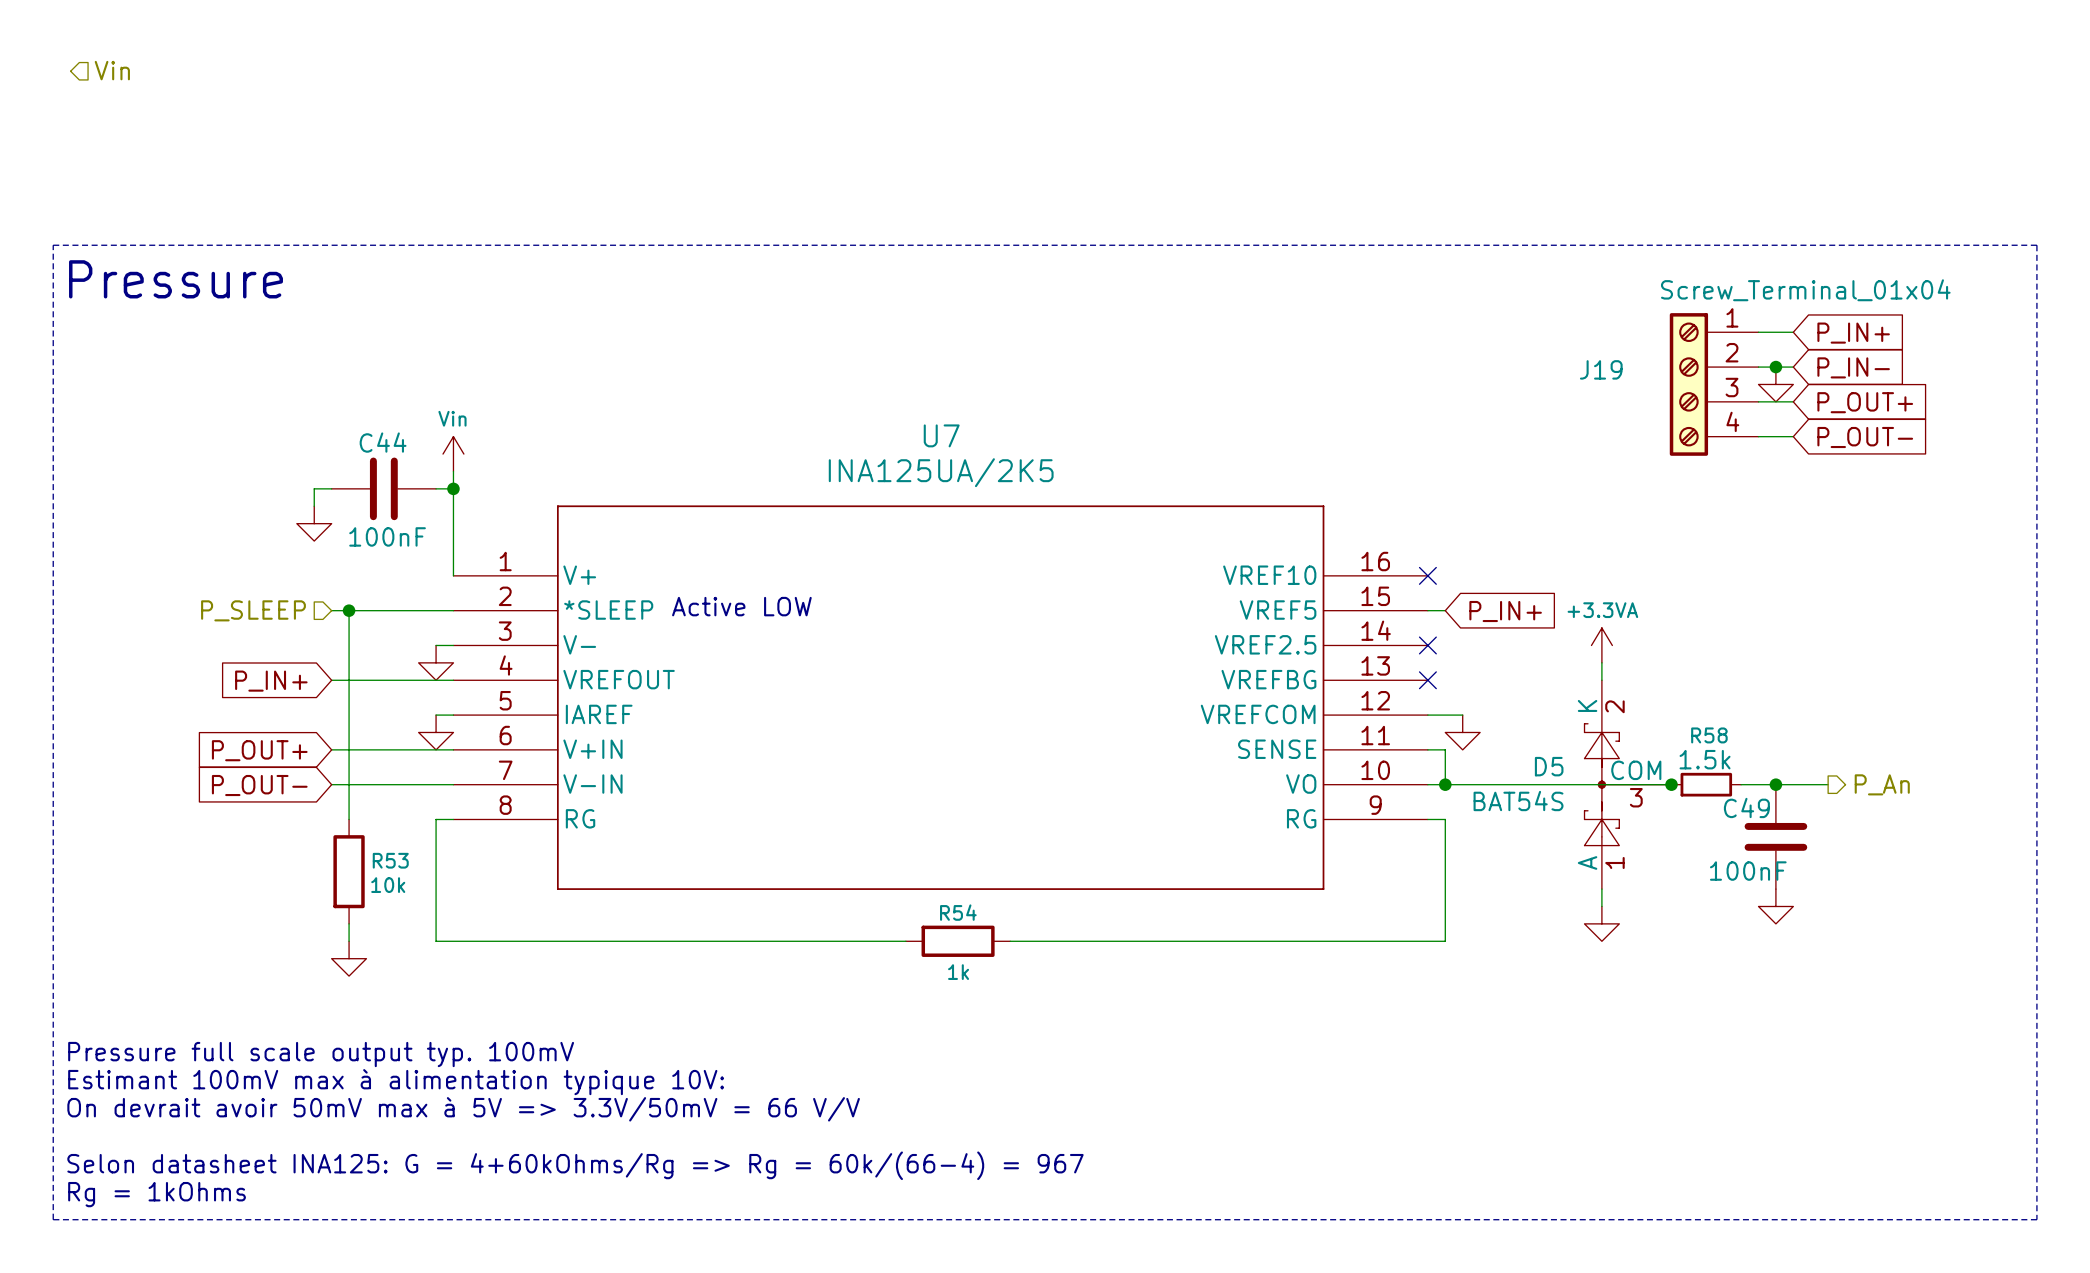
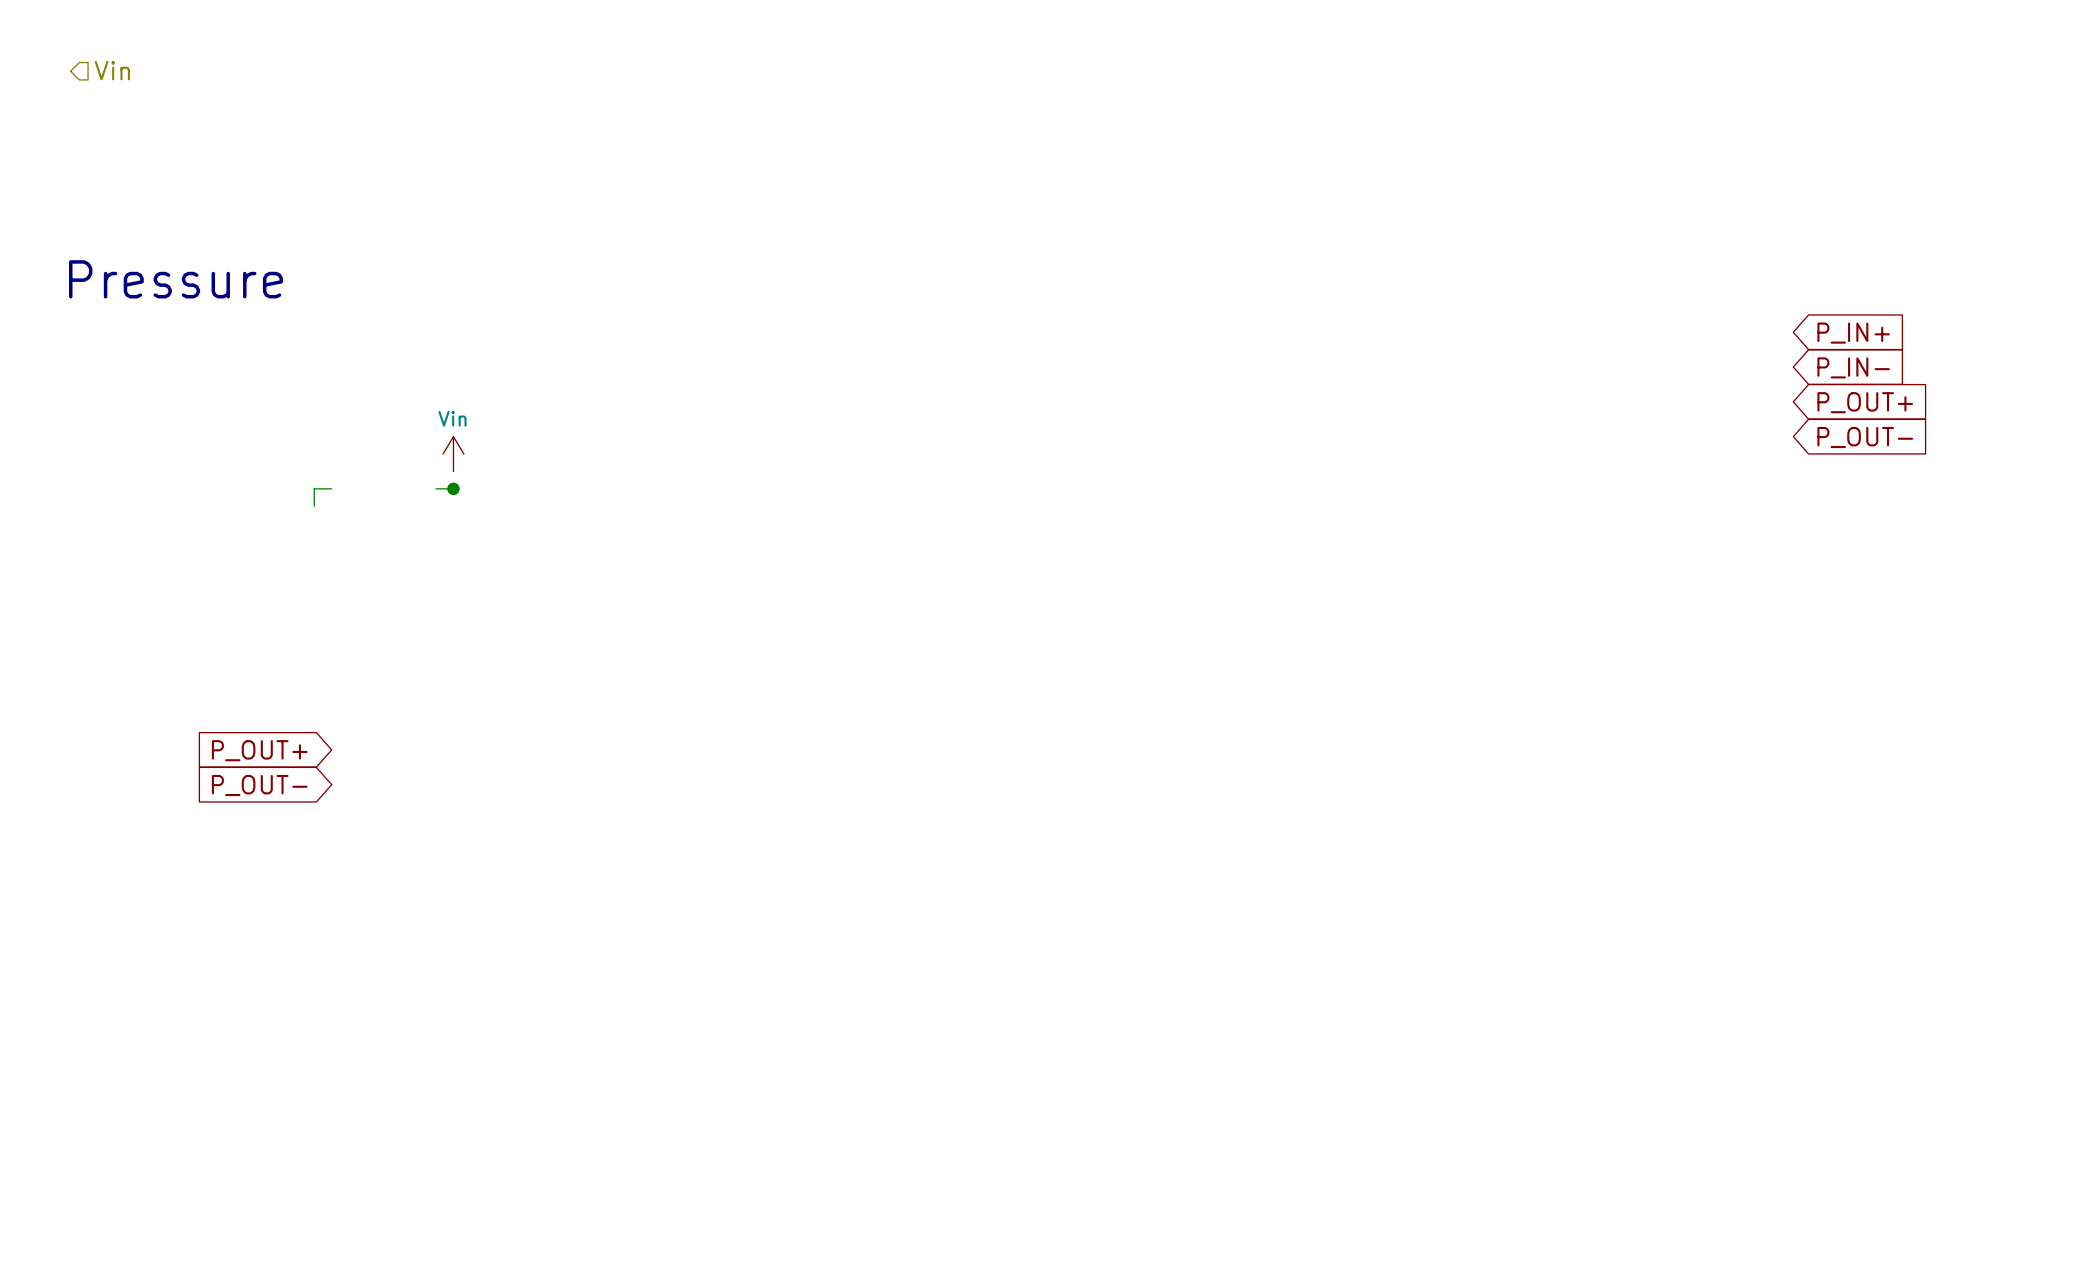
line: (53, 245) (2036, 245) (2036, 1219) (53, 1219) (53, 245) -> none
wire: (1758, 332) (1793, 332) -> none
wire: (1758, 367) (1793, 367) -> none
junction: (1775, 367) -> none
J19: Screw_Terminal_01x04 (1714, 384) -> none
power symbol: (1775, 384) -> none
wire: (1758, 401) (1793, 401) -> none
wire: (1758, 436) (1793, 436) -> none
wire: (453, 471) (453, 575) -> none
C44: 100nF (383, 488) -> none
power symbol: (314, 523) -> none
no-connect mark: (1427, 575) -> none
text: Active LOW (741, 606) -> none
hierarchical label: P_SLEEP (253, 610) -> none
wire: (331, 610) (453, 610) -> none
wire: (349, 610) (349, 819) -> none
junction: (349, 610) -> none
wire: (1427, 610) (1445, 610) -> none
global label: P_IN+ (1505, 611) -> none
wire: (436, 645) (453, 645) -> none
no-connect mark: (1427, 645) -> none
power symbol: +3.3VA (1601, 645) -> none
power symbol: (436, 662) -> none
wire: (1601, 662) (1601, 680) -> none
wire: (331, 680) (453, 680) -> none
no-connect mark: (1427, 680) -> none
global label: P_IN+ (271, 681) -> none
U7: INA125UA/2K5 (940, 697) -> none
wire: (436, 715) (453, 715) -> none
wire: (1427, 715) (1462, 715) -> none
power symbol: (436, 732) -> none
power symbol: (1462, 732) -> none
wire: (331, 749) (453, 749) -> none
wire: (1427, 749) (1445, 749) (1445, 784) -> none
wire: (331, 784) (453, 784) -> none
wire: (1427, 784) (1671, 784) -> none
junction: (1445, 784) -> none
D5: BAT54S (1628, 784) -> none
junction: (1671, 784) -> none
R58: 1.5k (1706, 784) -> none
wire: (1741, 784) (1828, 784) -> none
junction: (1775, 784) -> none
hierarchical label: P_An (1882, 784) -> none
wire: (453, 819) (436, 819) (436, 941) (905, 941) -> none
wire: (1427, 819) (1445, 819) (1445, 941) (1010, 941) -> none
C49: 100nF (1775, 836) -> none
R53: 10k (349, 871) -> none
wire: (1601, 889) (1601, 906) -> none
power symbol: (1775, 906) -> none
wire: (349, 923) (349, 941) -> none
power symbol: (1601, 923) -> none
R54: 1k (958, 941) -> none
power symbol: (349, 958) -> none
text: Pressure full scale output typ. 100mV (321, 1054) -> none
text: Estimant 100mV max à alimentation typique 10V: (396, 1082) -> none
text: On devrait avoir 50mV max à 5V => 3.3V/50mV = 66 V/V (463, 1109) -> none
text: Selon datasheet INA125: G = 4+60kOhms/Rg => Rg = 60k/(66-4) = 967 (575, 1165) -> none
text: Rg = 1kOhms (157, 1194) -> none

